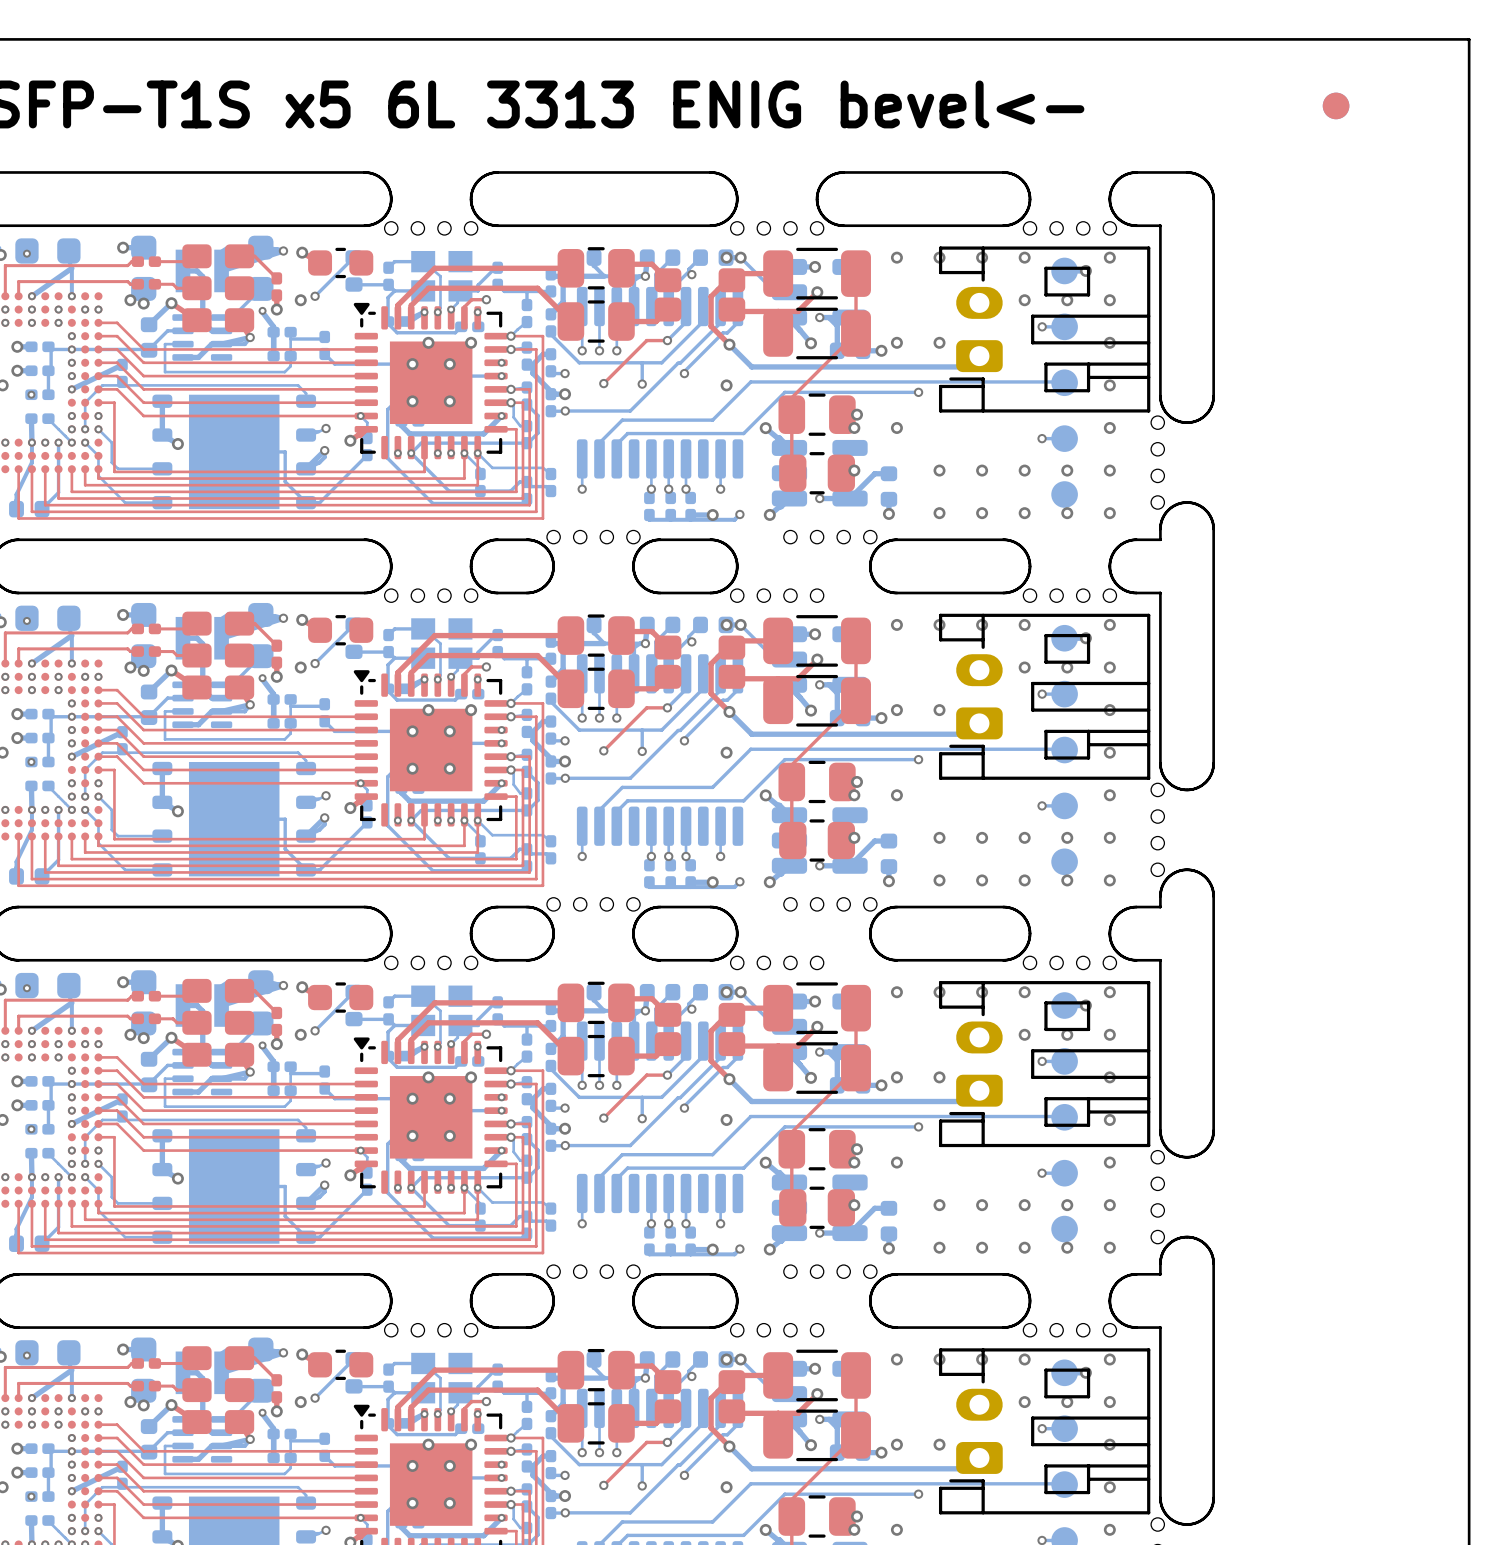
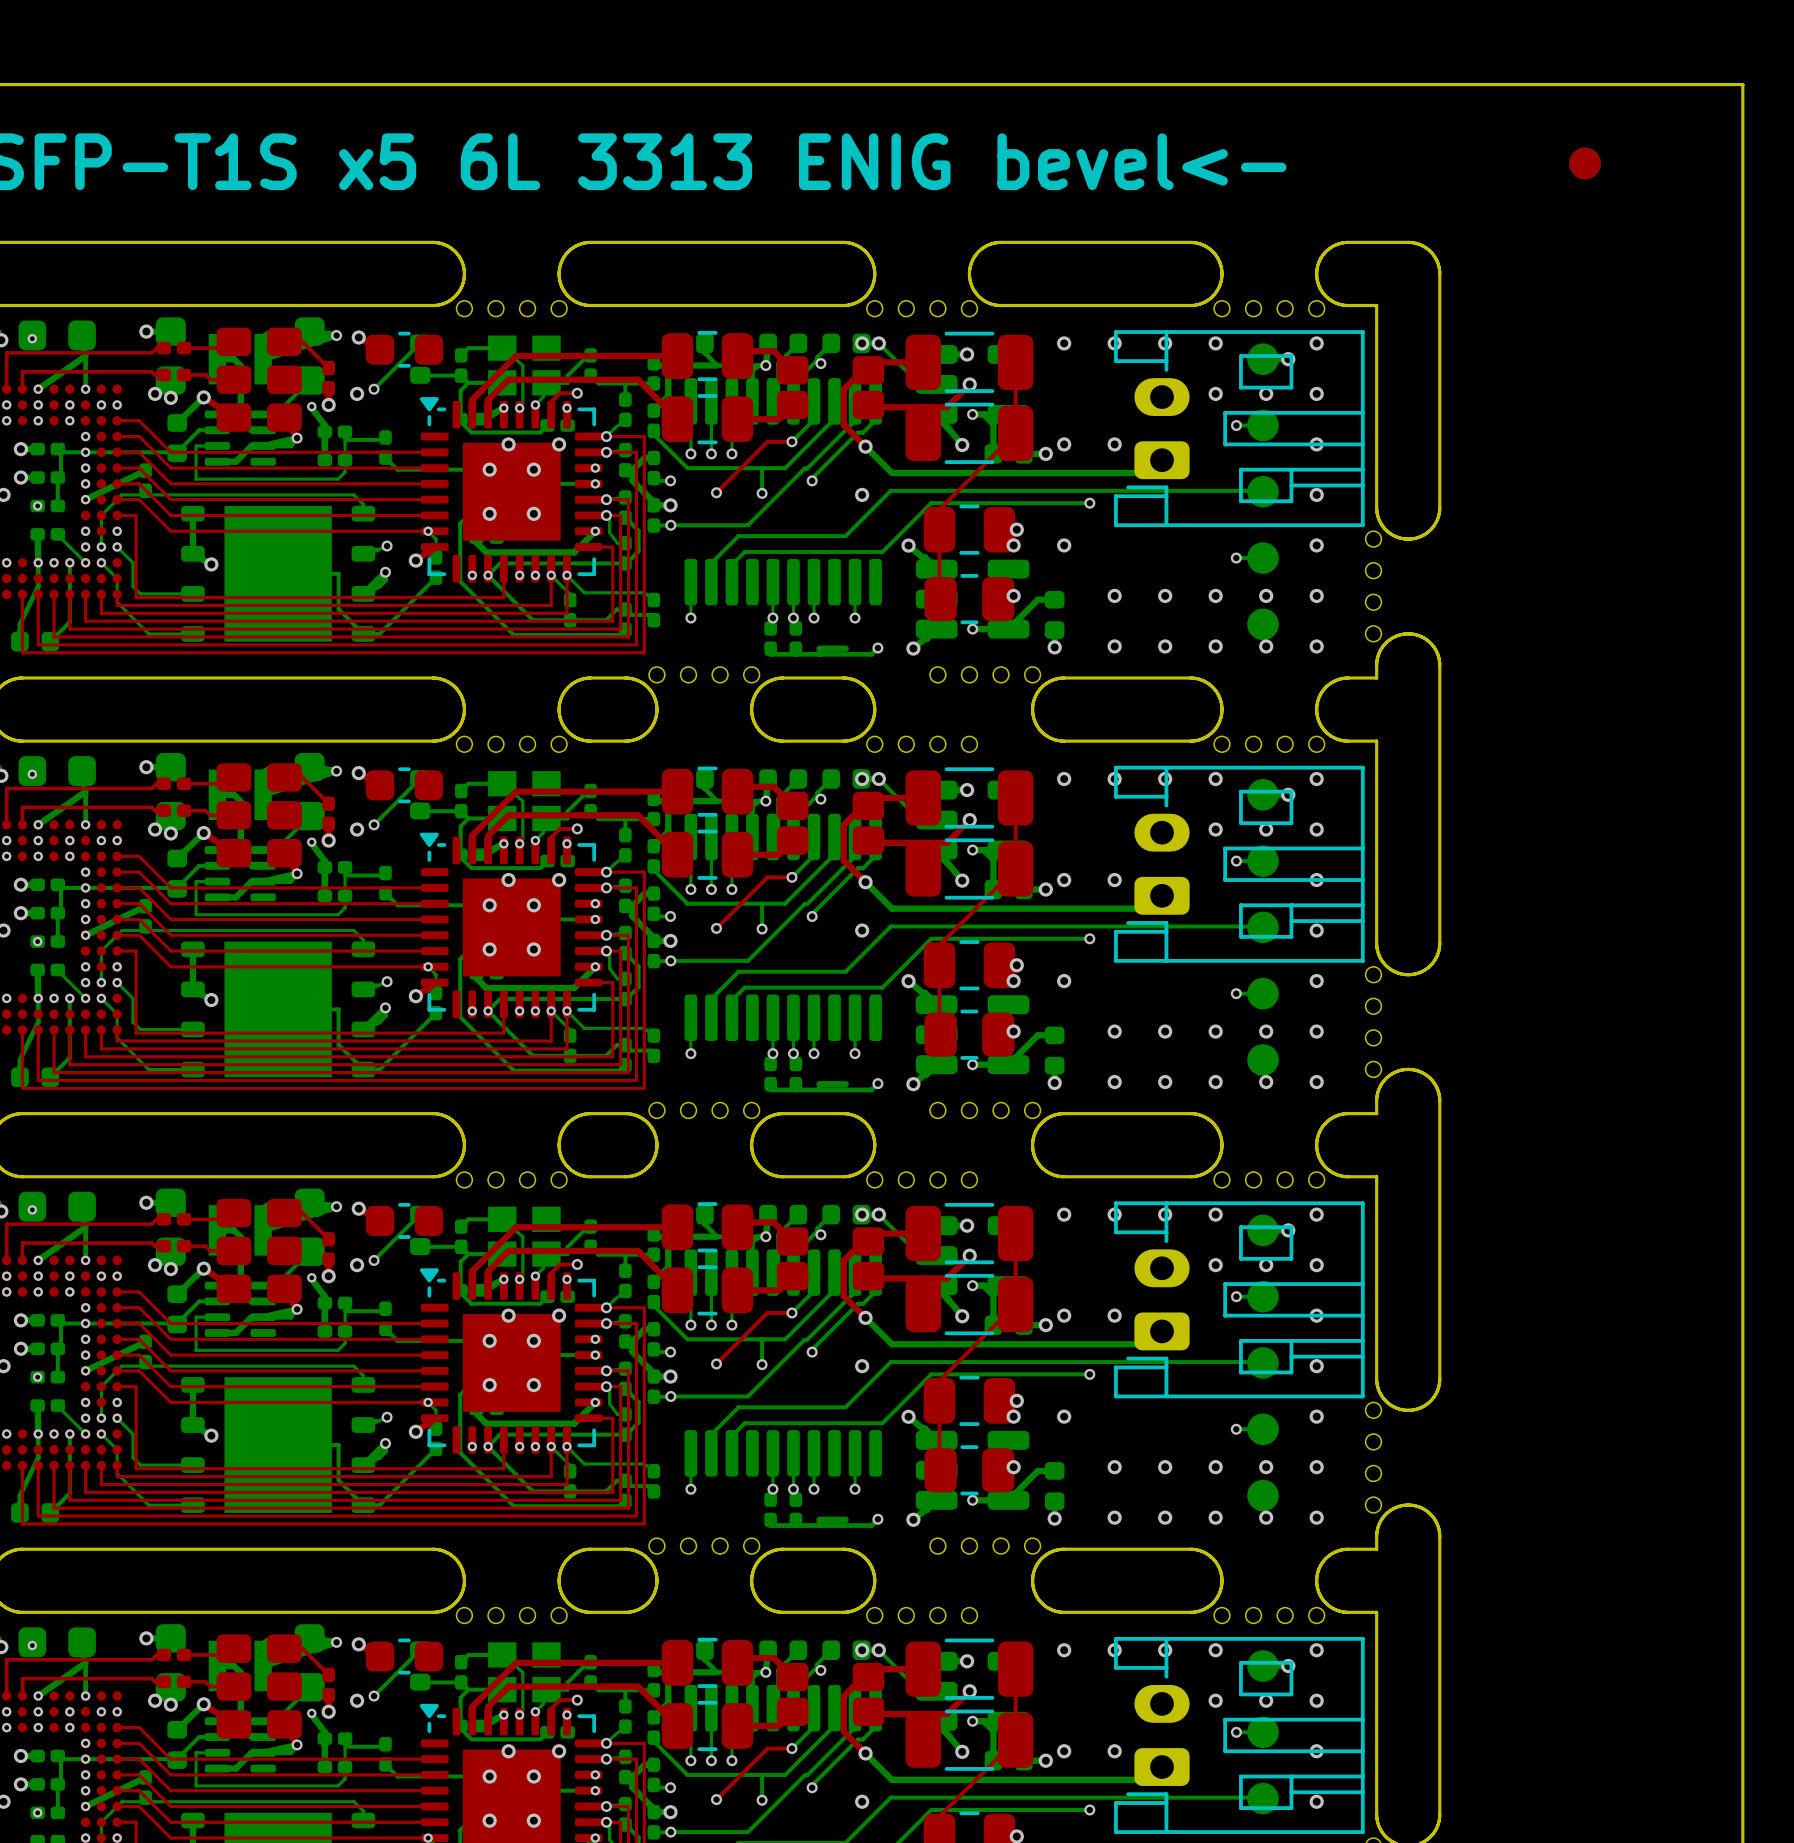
part: (690, 506) -> none
via: (712, 515) -> none
part: (690, 873) -> none
via: (712, 882) -> none
part: (690, 1241) -> none
via: (712, 1249) -> none

